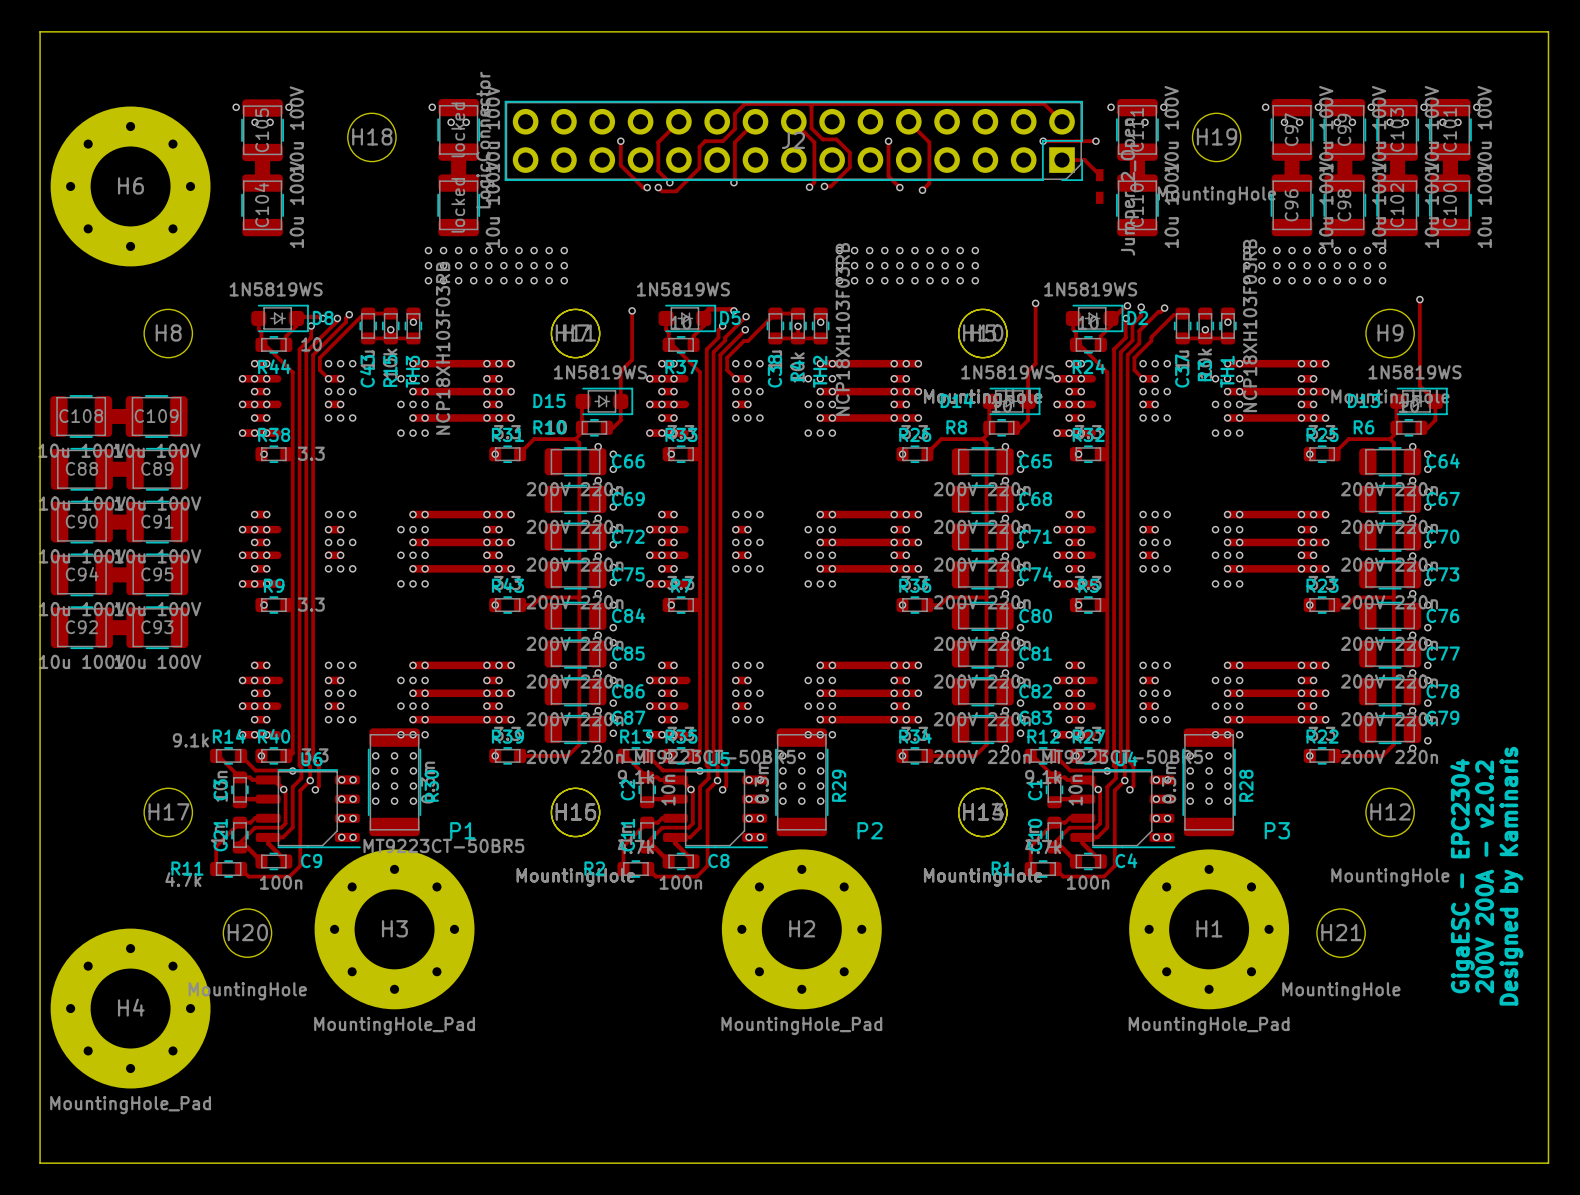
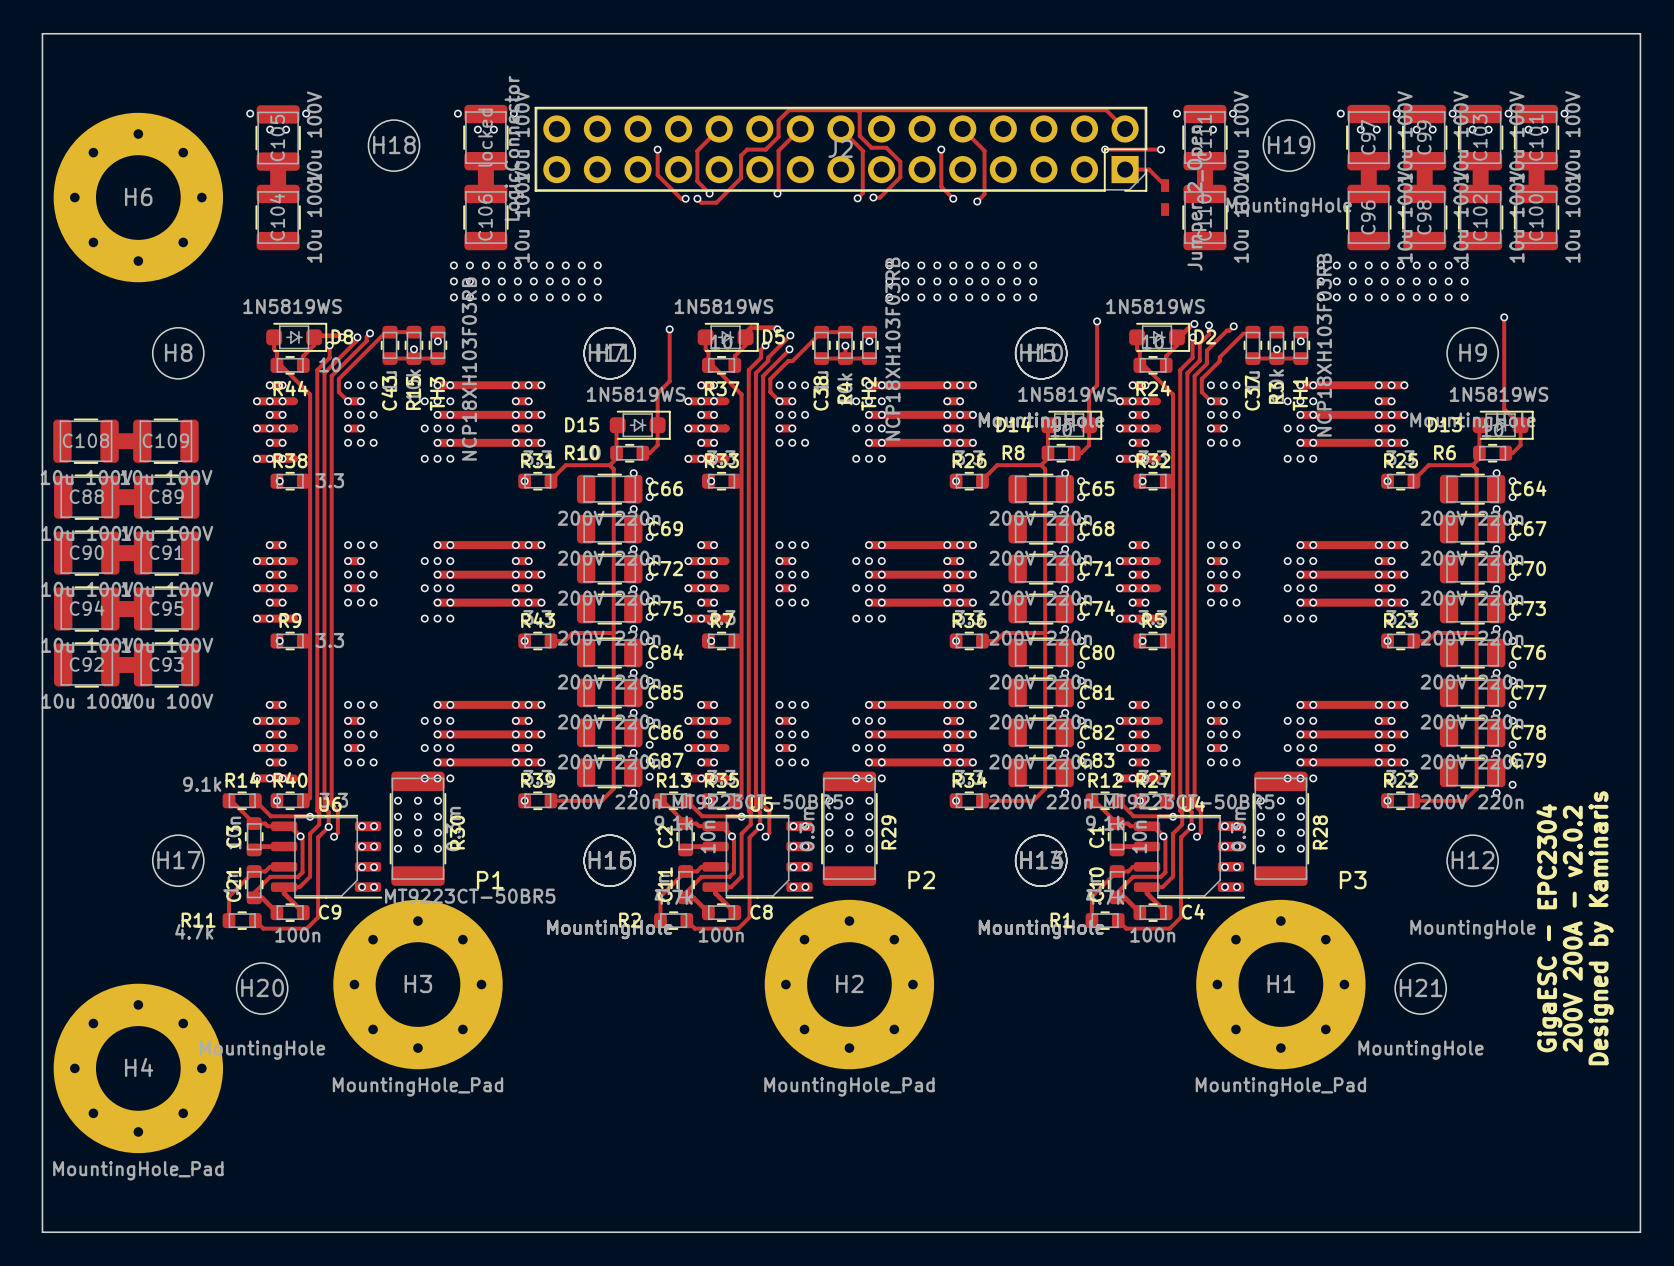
locked name: locked (458, 205) -> C106 (485, 217)

